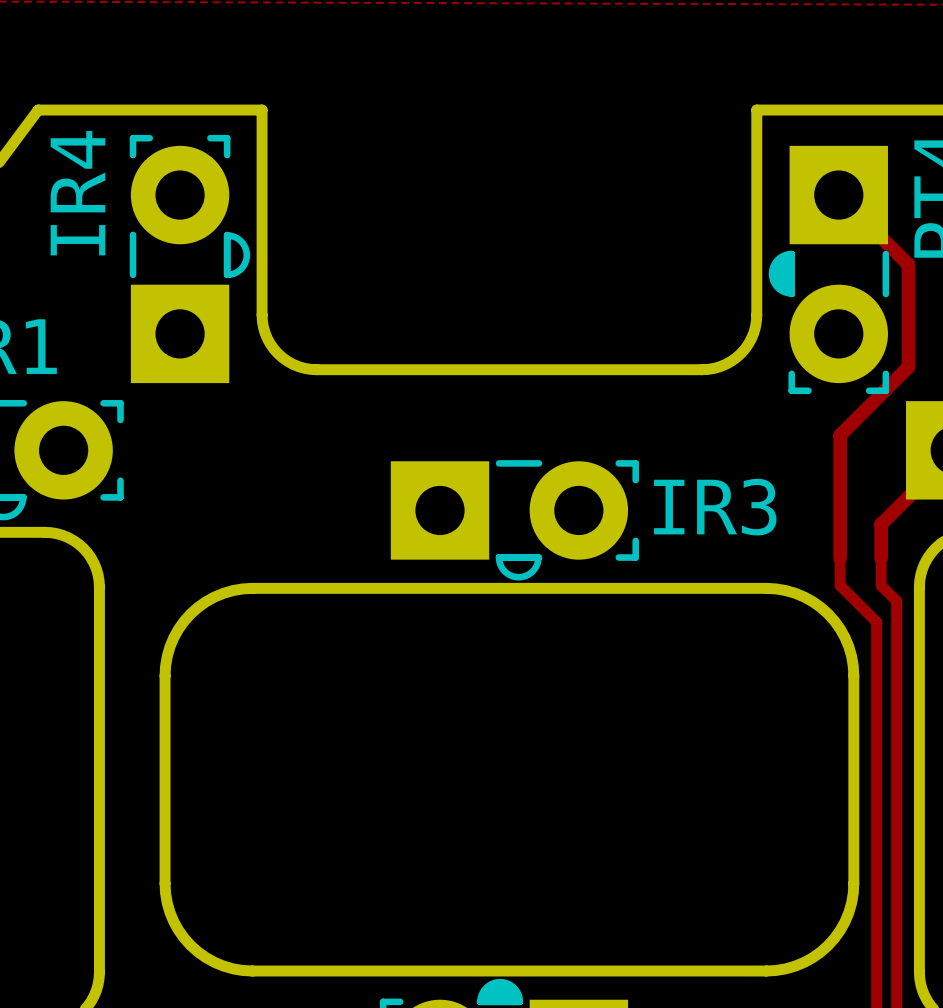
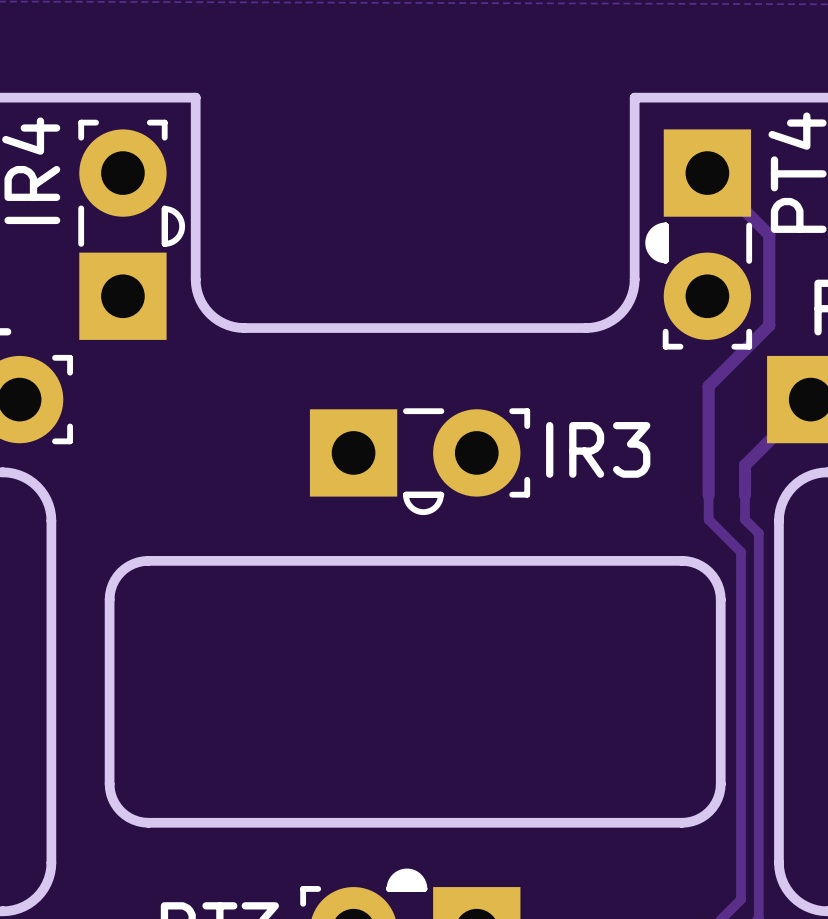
board edge: (165, 675) (167, 656) (173, 637) (190, 613) (214, 597) (233, 590) (252, 588) (776, 588) (804, 597) (828, 613) (845, 637) (851, 656) (853, 675) -> (109, 599) (112, 584) (120, 572) (133, 563) (148, 560) (687, 561) (701, 566) (712, 576) (719, 589) (720, 599)
board edge: (165, 883) (169, 912) (178, 930) (190, 945) (214, 962) (233, 968) (252, 971) (776, 970) (795, 966) (812, 957) (834, 938) (848, 912) (853, 883) -> (109, 783) (112, 798) (120, 811) (133, 819) (148, 822) (687, 822) (701, 817) (712, 807) (717, 798) (720, 783)

